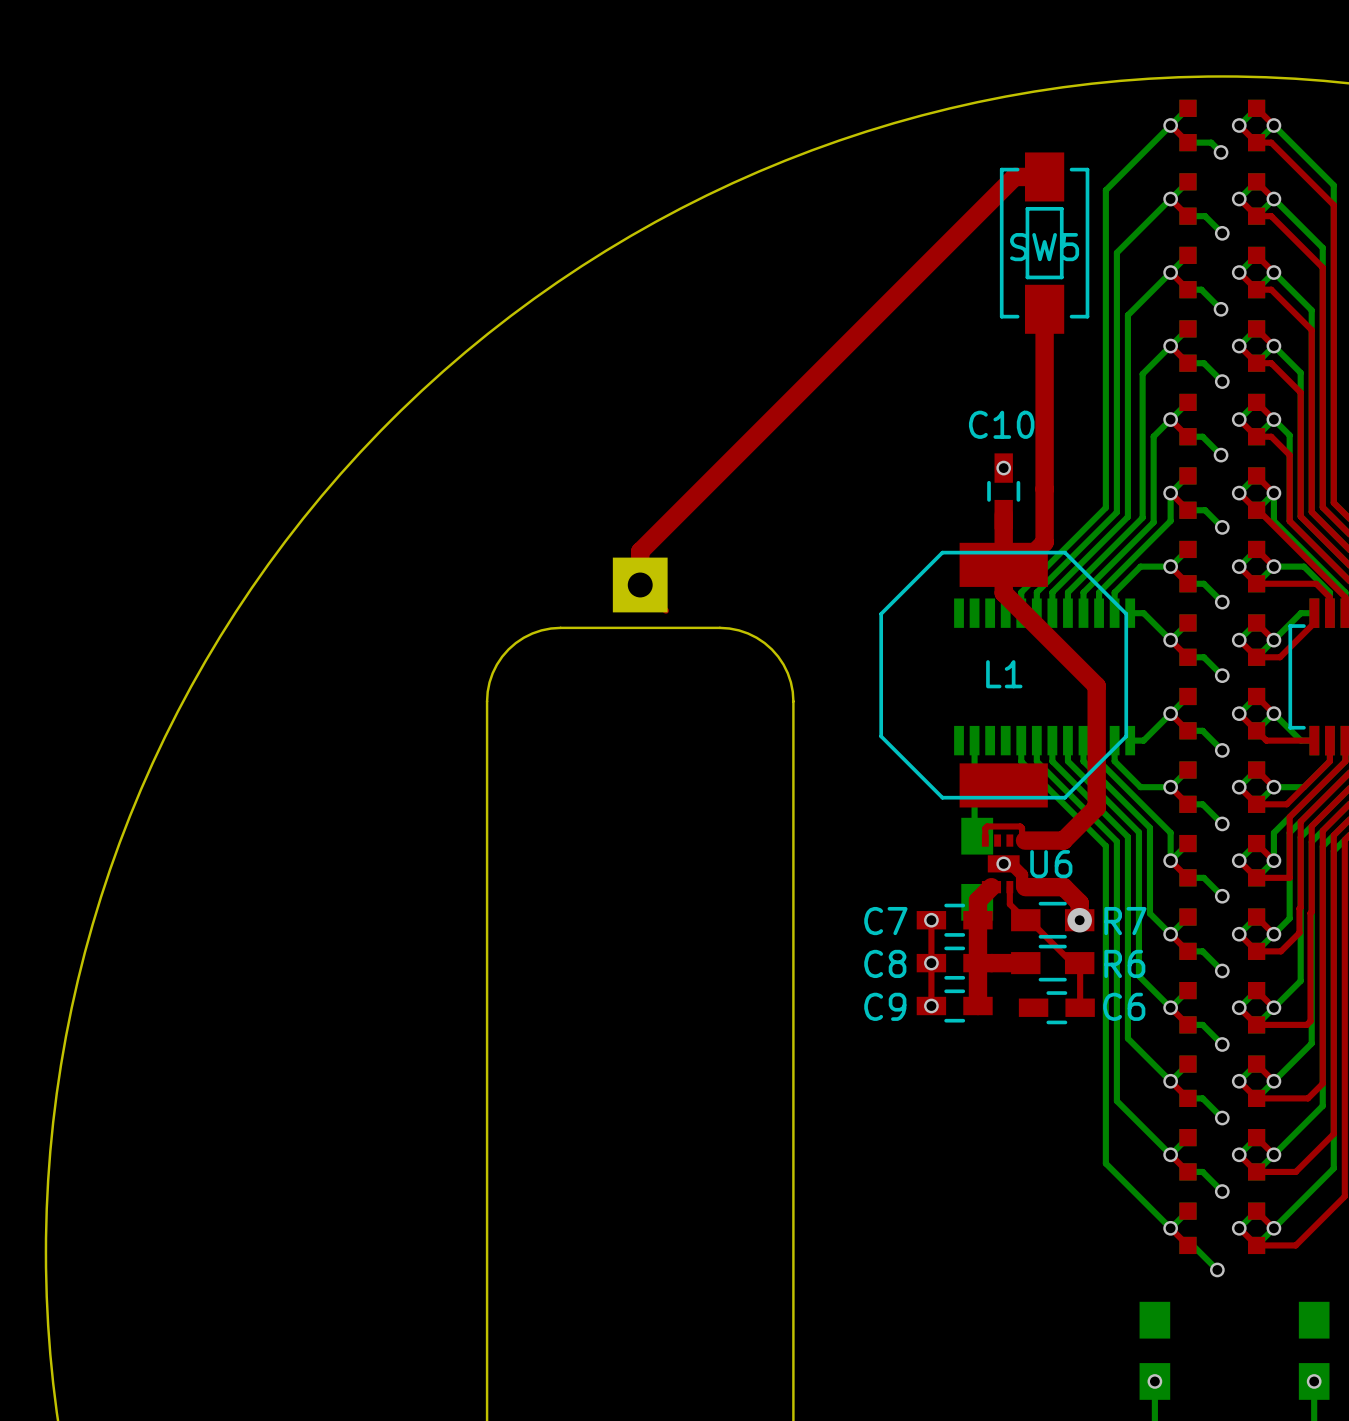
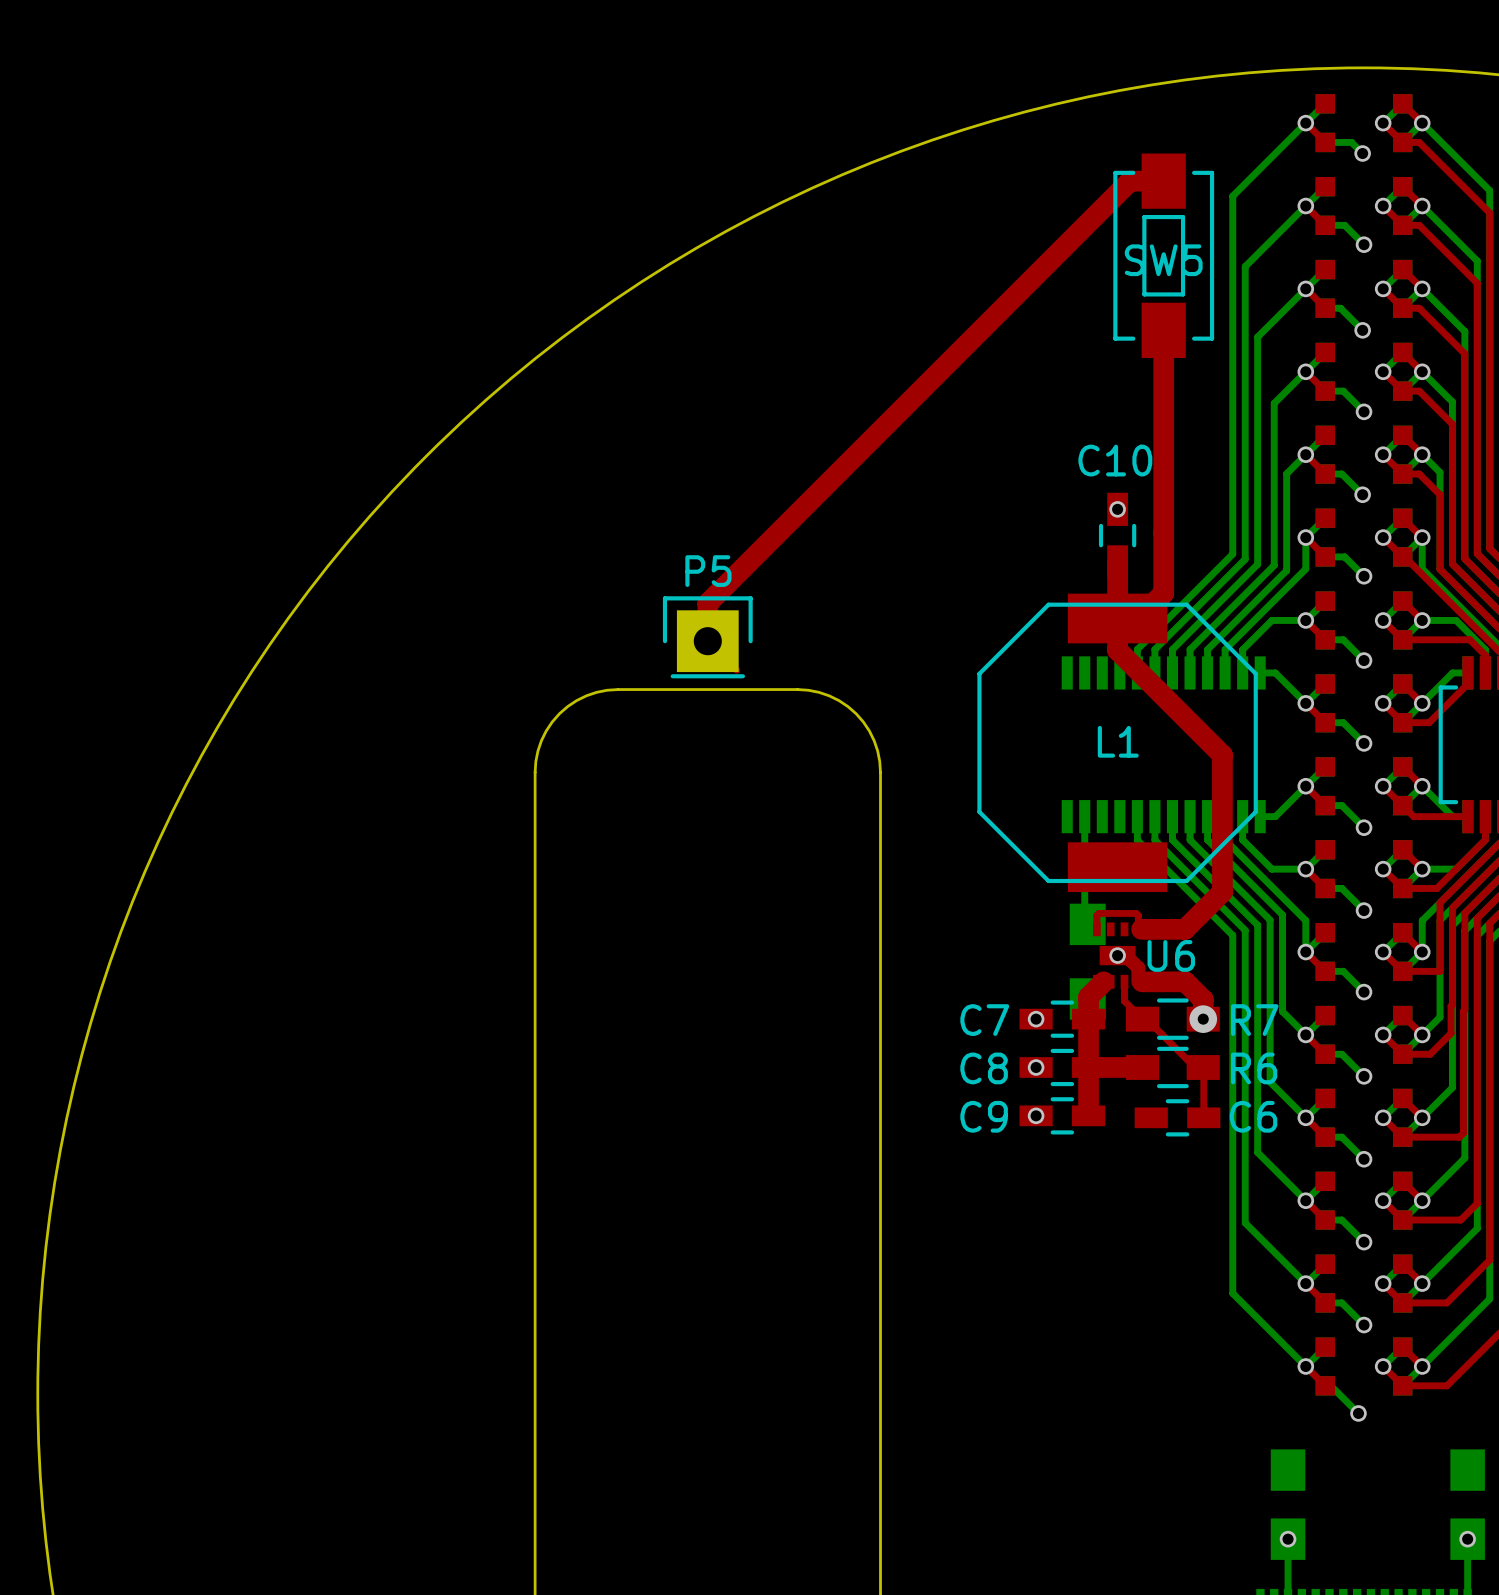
P5 side: bottom (640, 584) -> top (707, 637)
top track: (931, 920) (931, 1006) -> none

